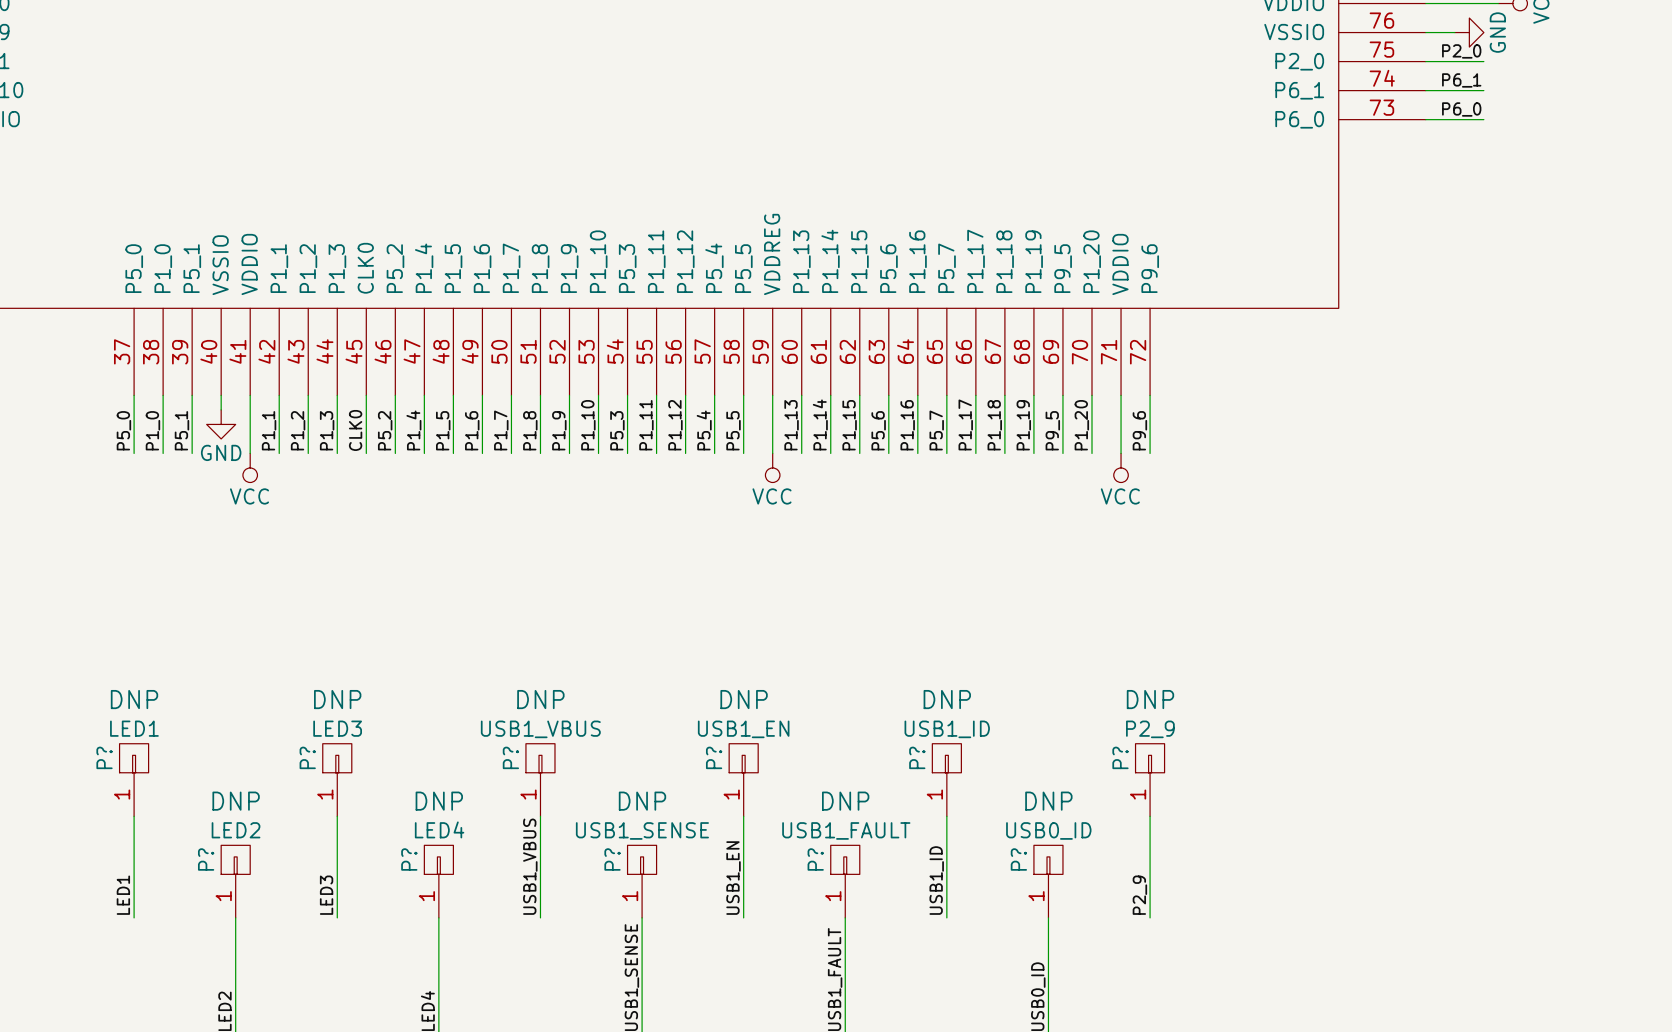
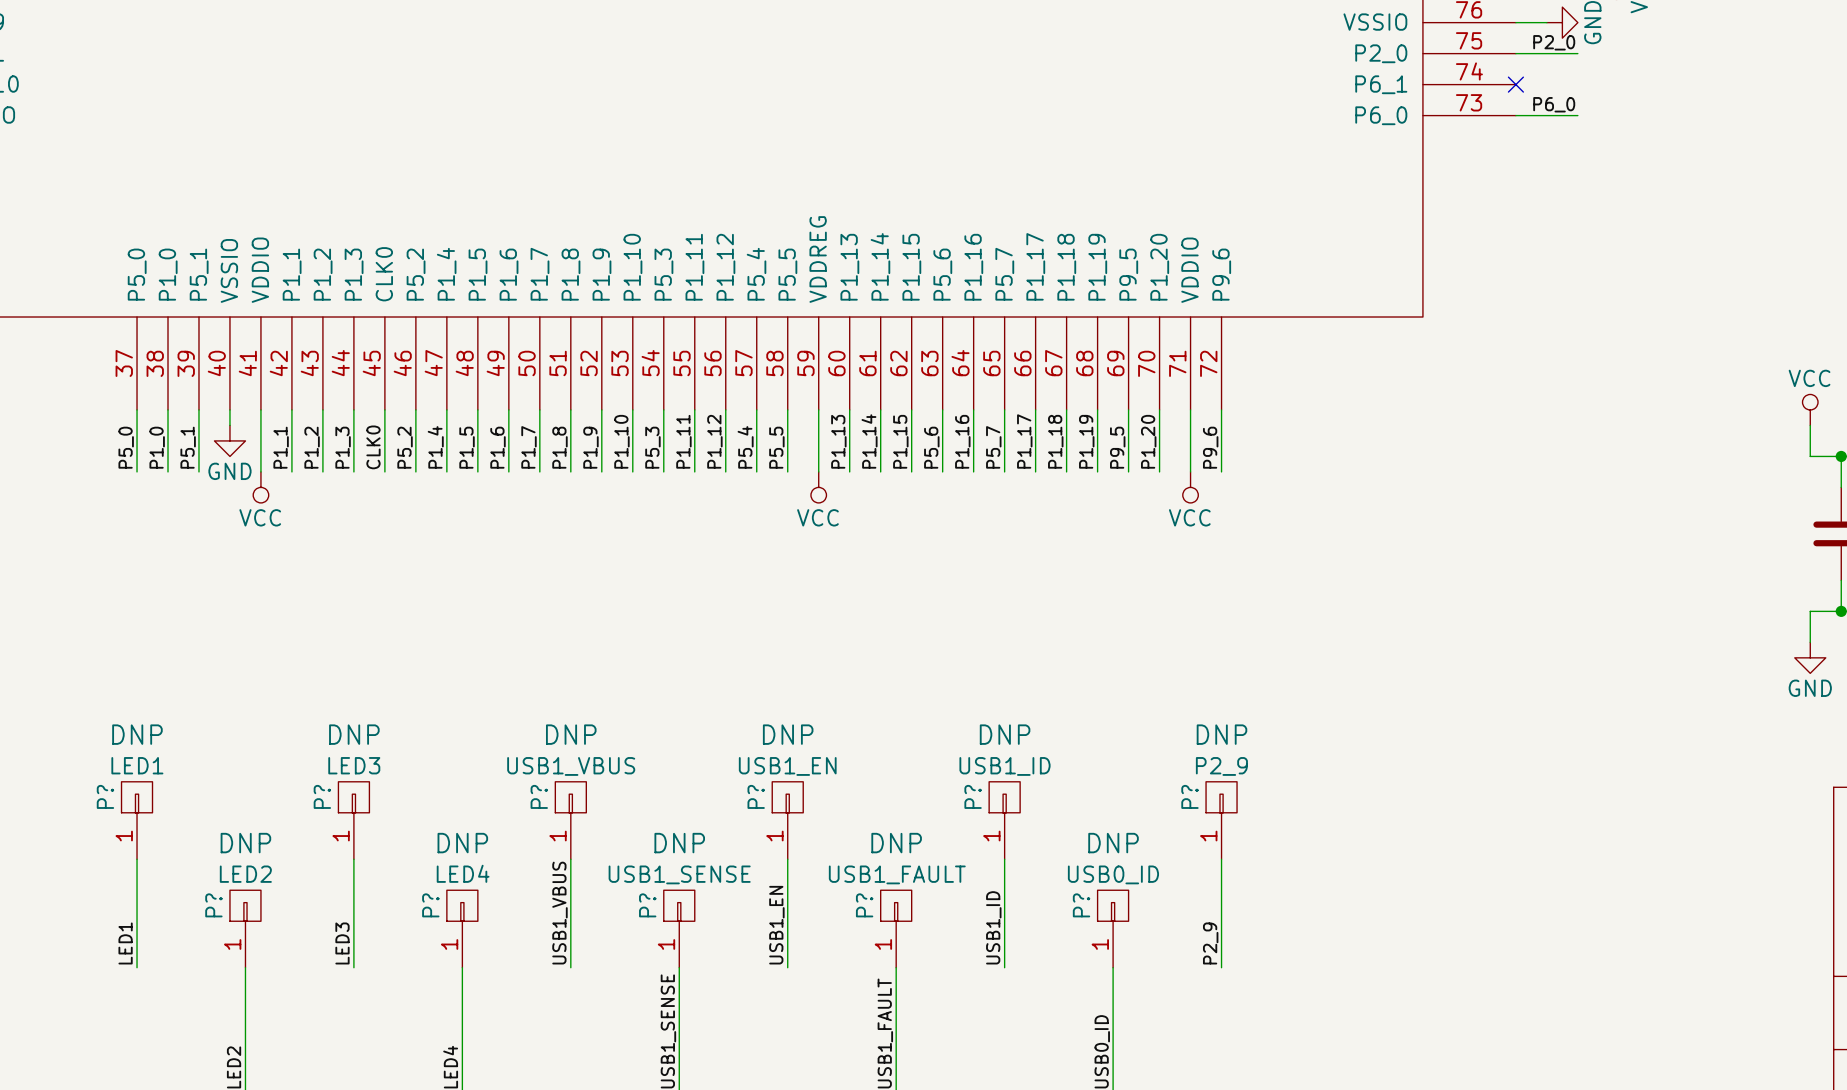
label: P6_1 (1461, 80) -> none
wire: (1425, 90) (1483, 90) -> none
no-connect mark: none -> (1515, 84)

